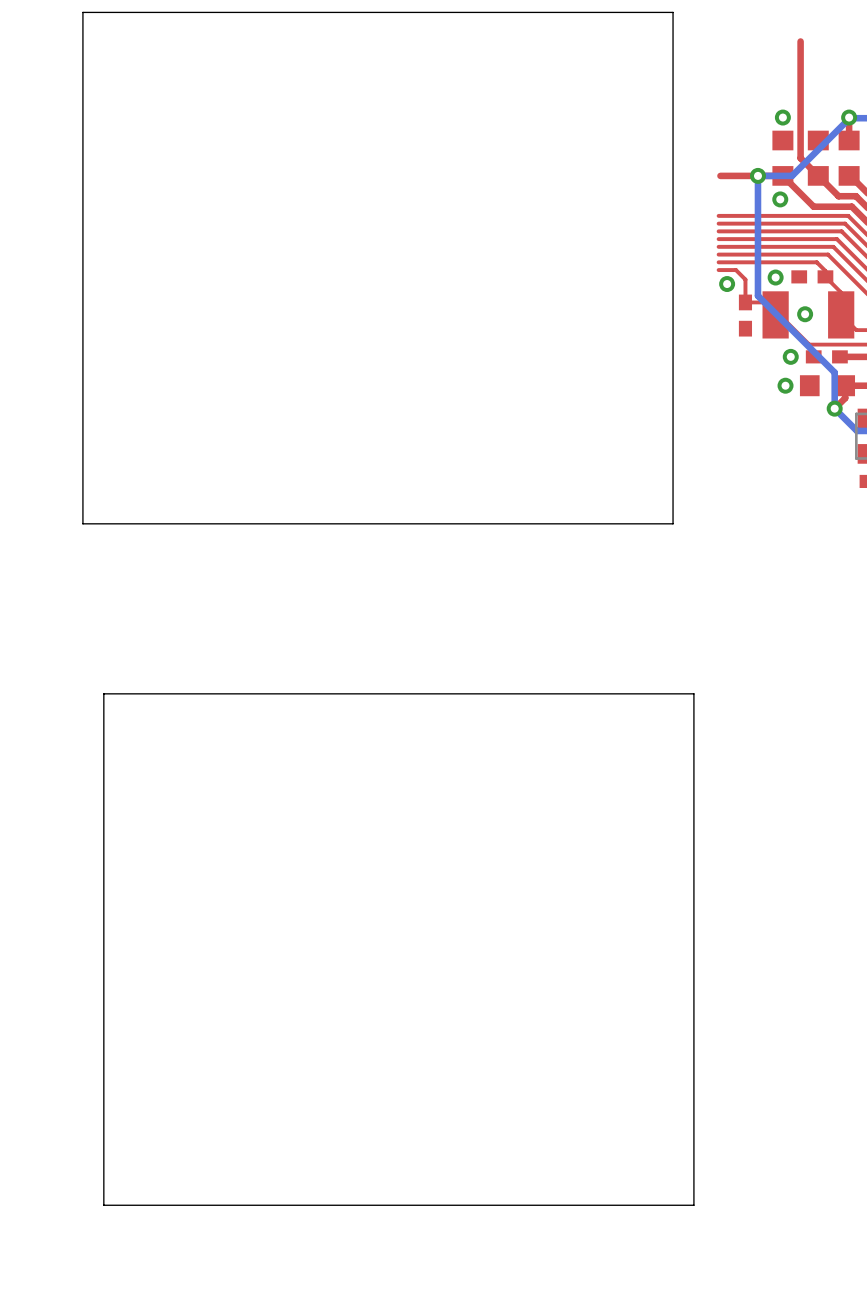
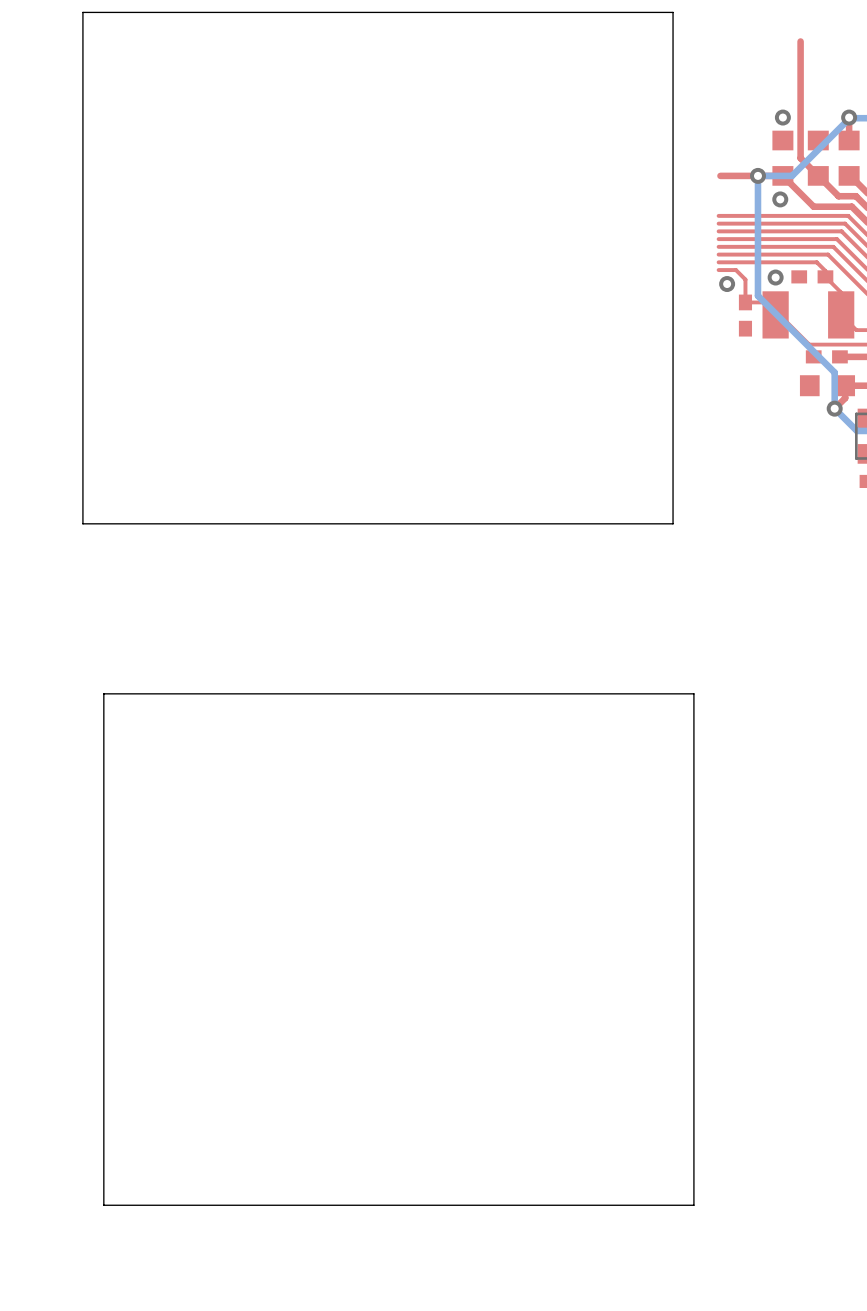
via: (805, 314) -> none
via: (790, 356) -> none
via: (785, 385) -> none

